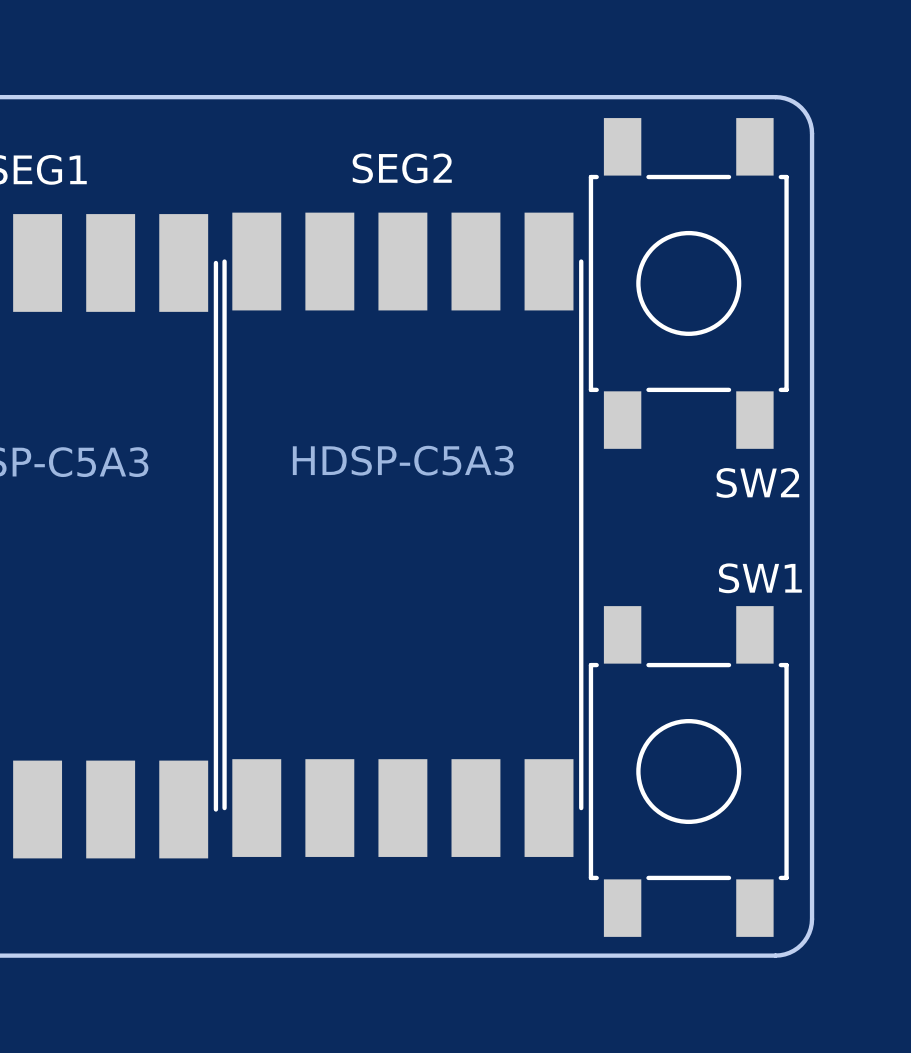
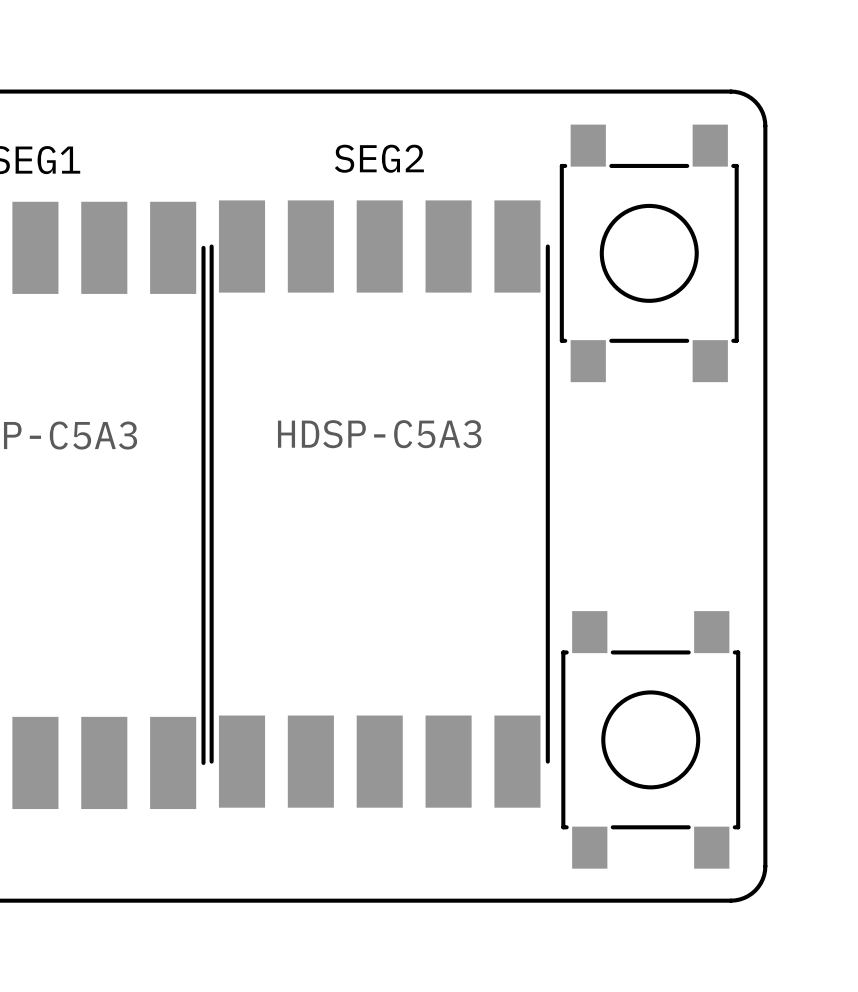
part: none -> (649, 253)
SW2: (688, 283) -> none
SW1: (688, 771) -> none
part: none -> (650, 739)

